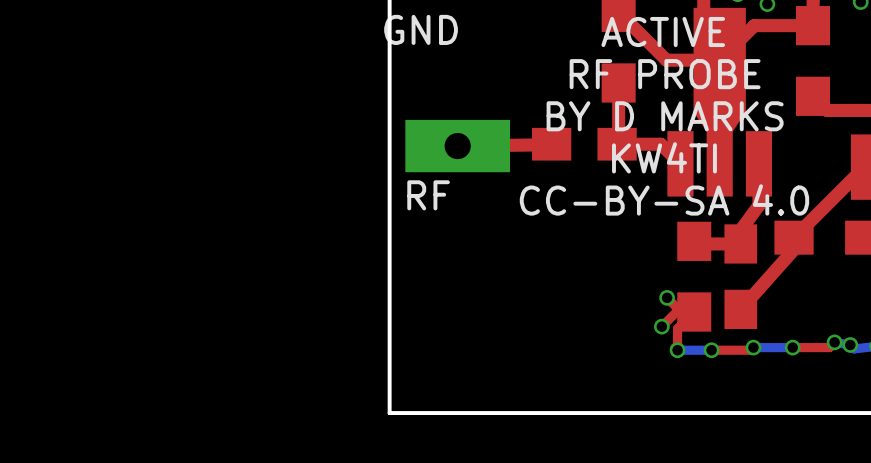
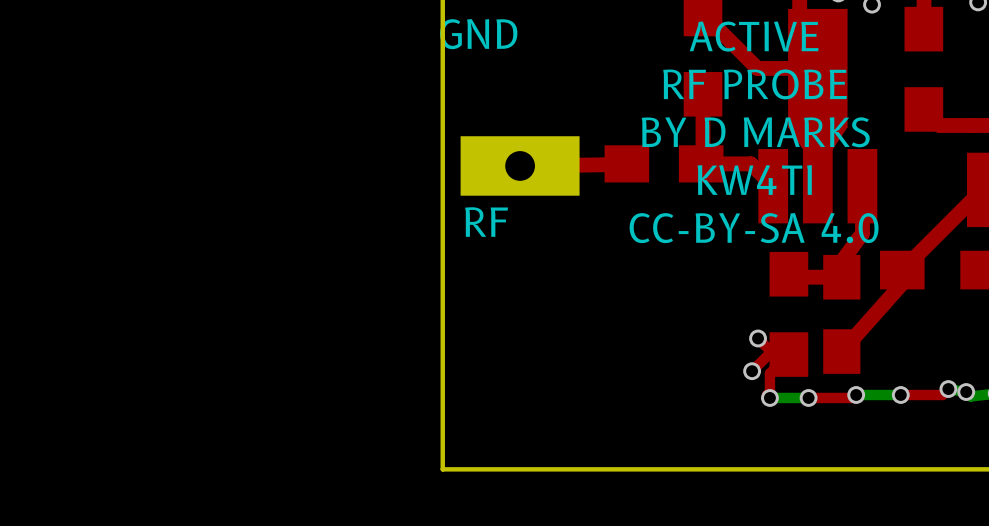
top track: (813, 25) (754, 25) (719, 60) -> none

